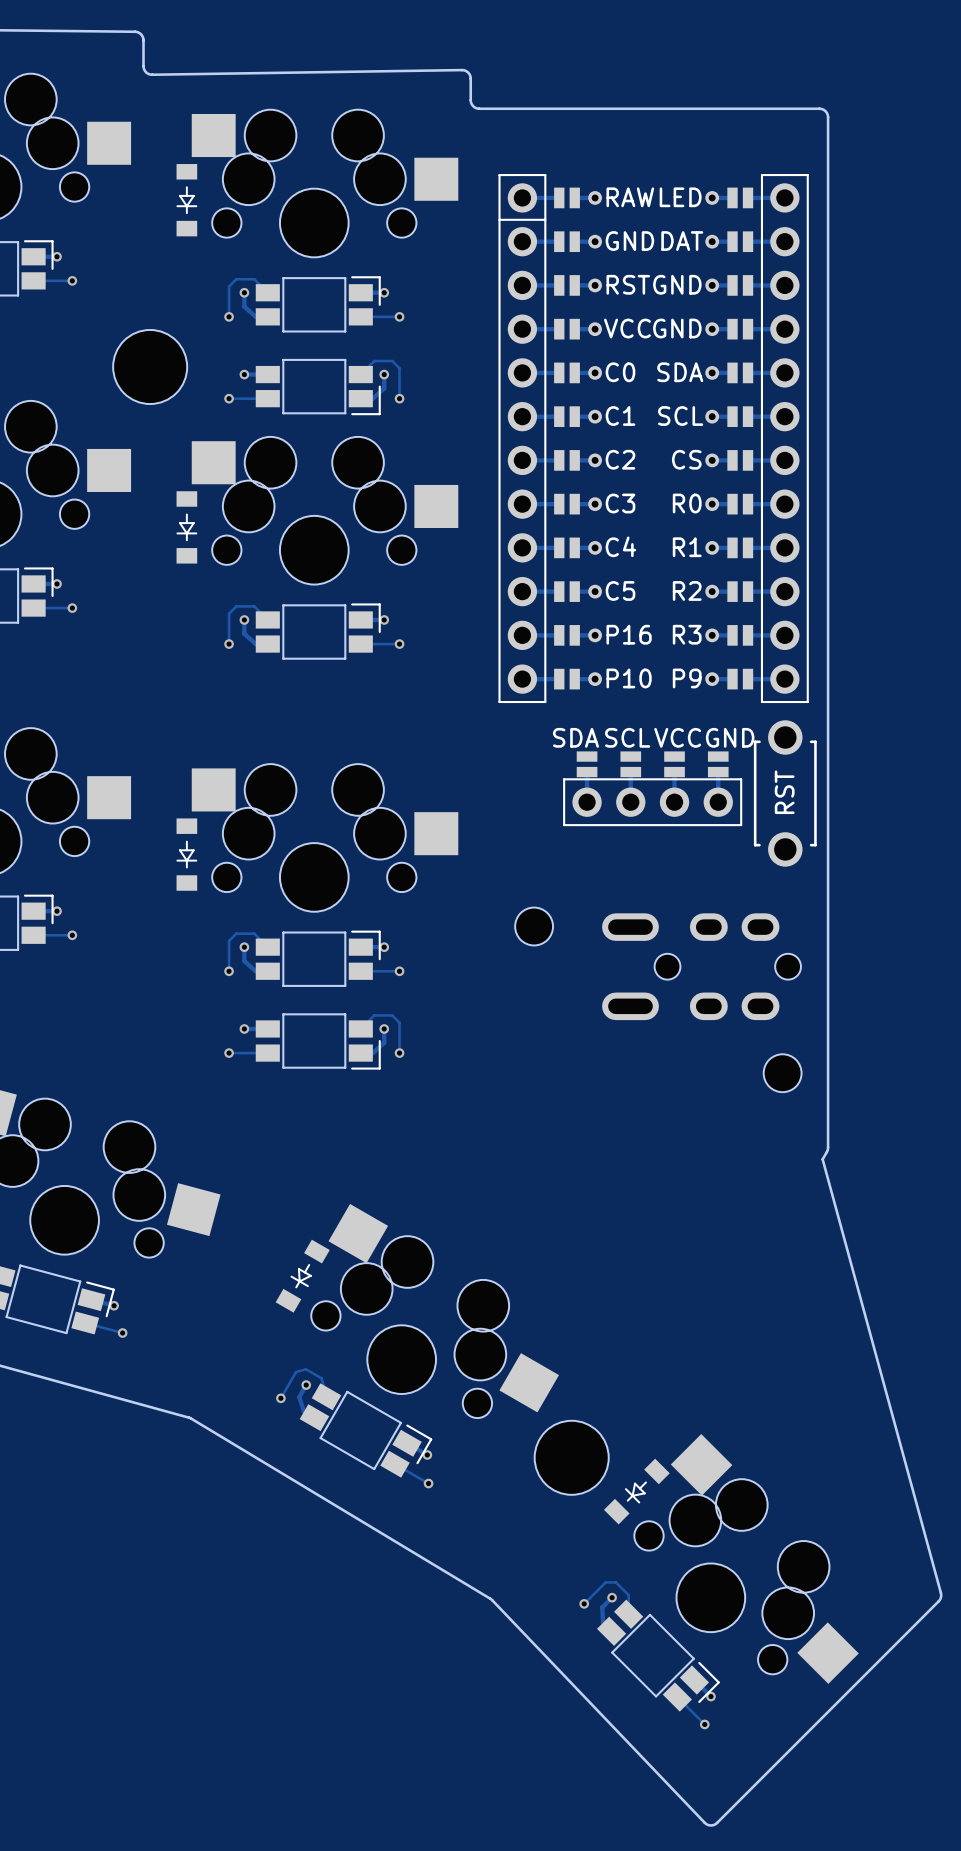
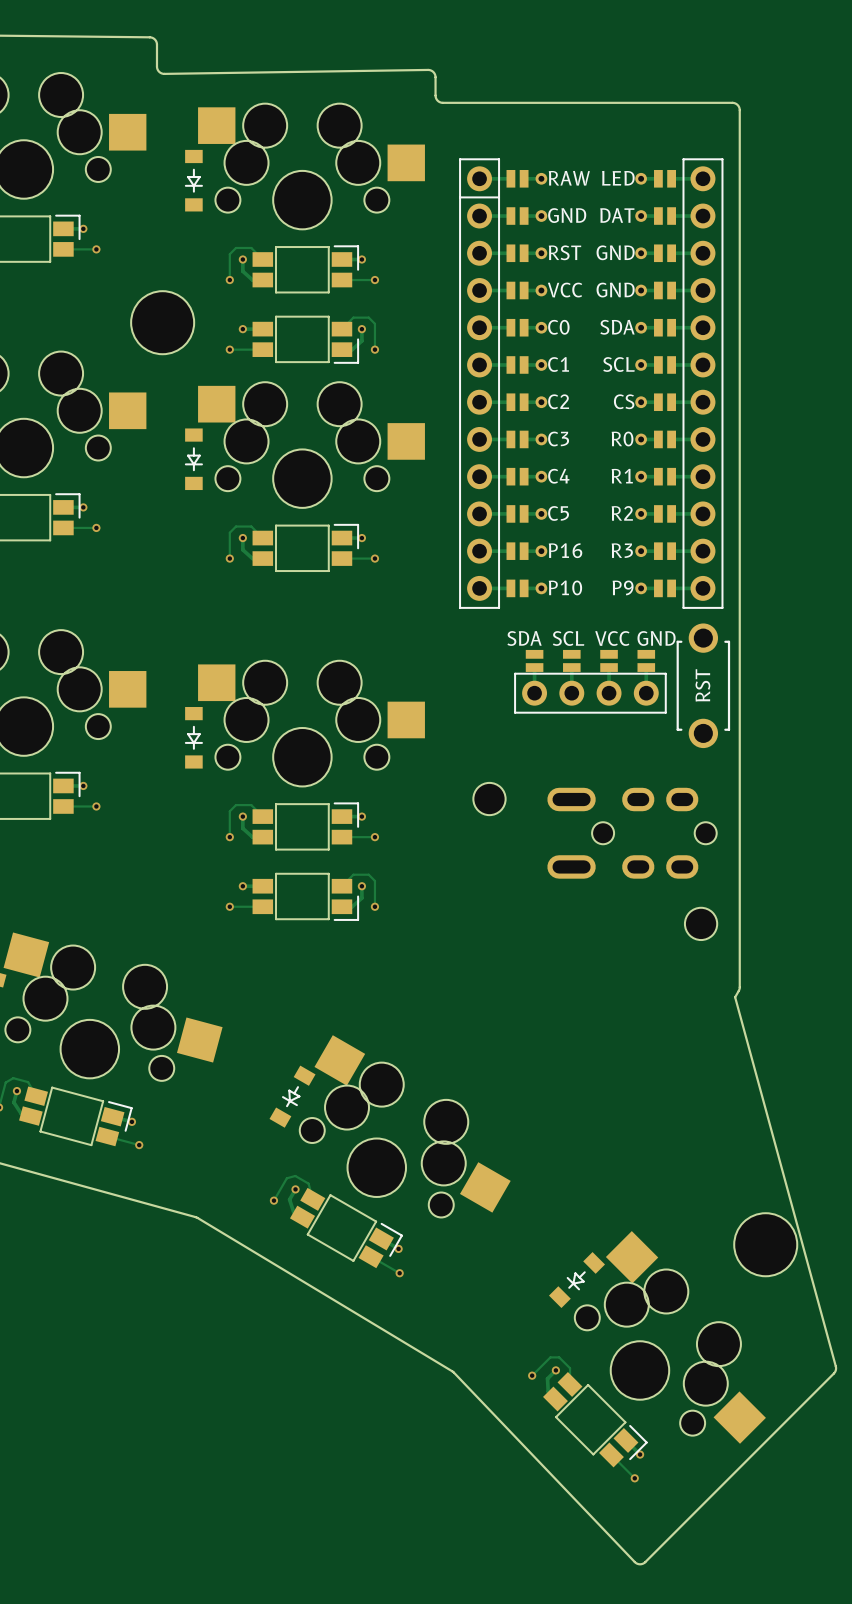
part position: (571, 1457) -> (765, 1244)

